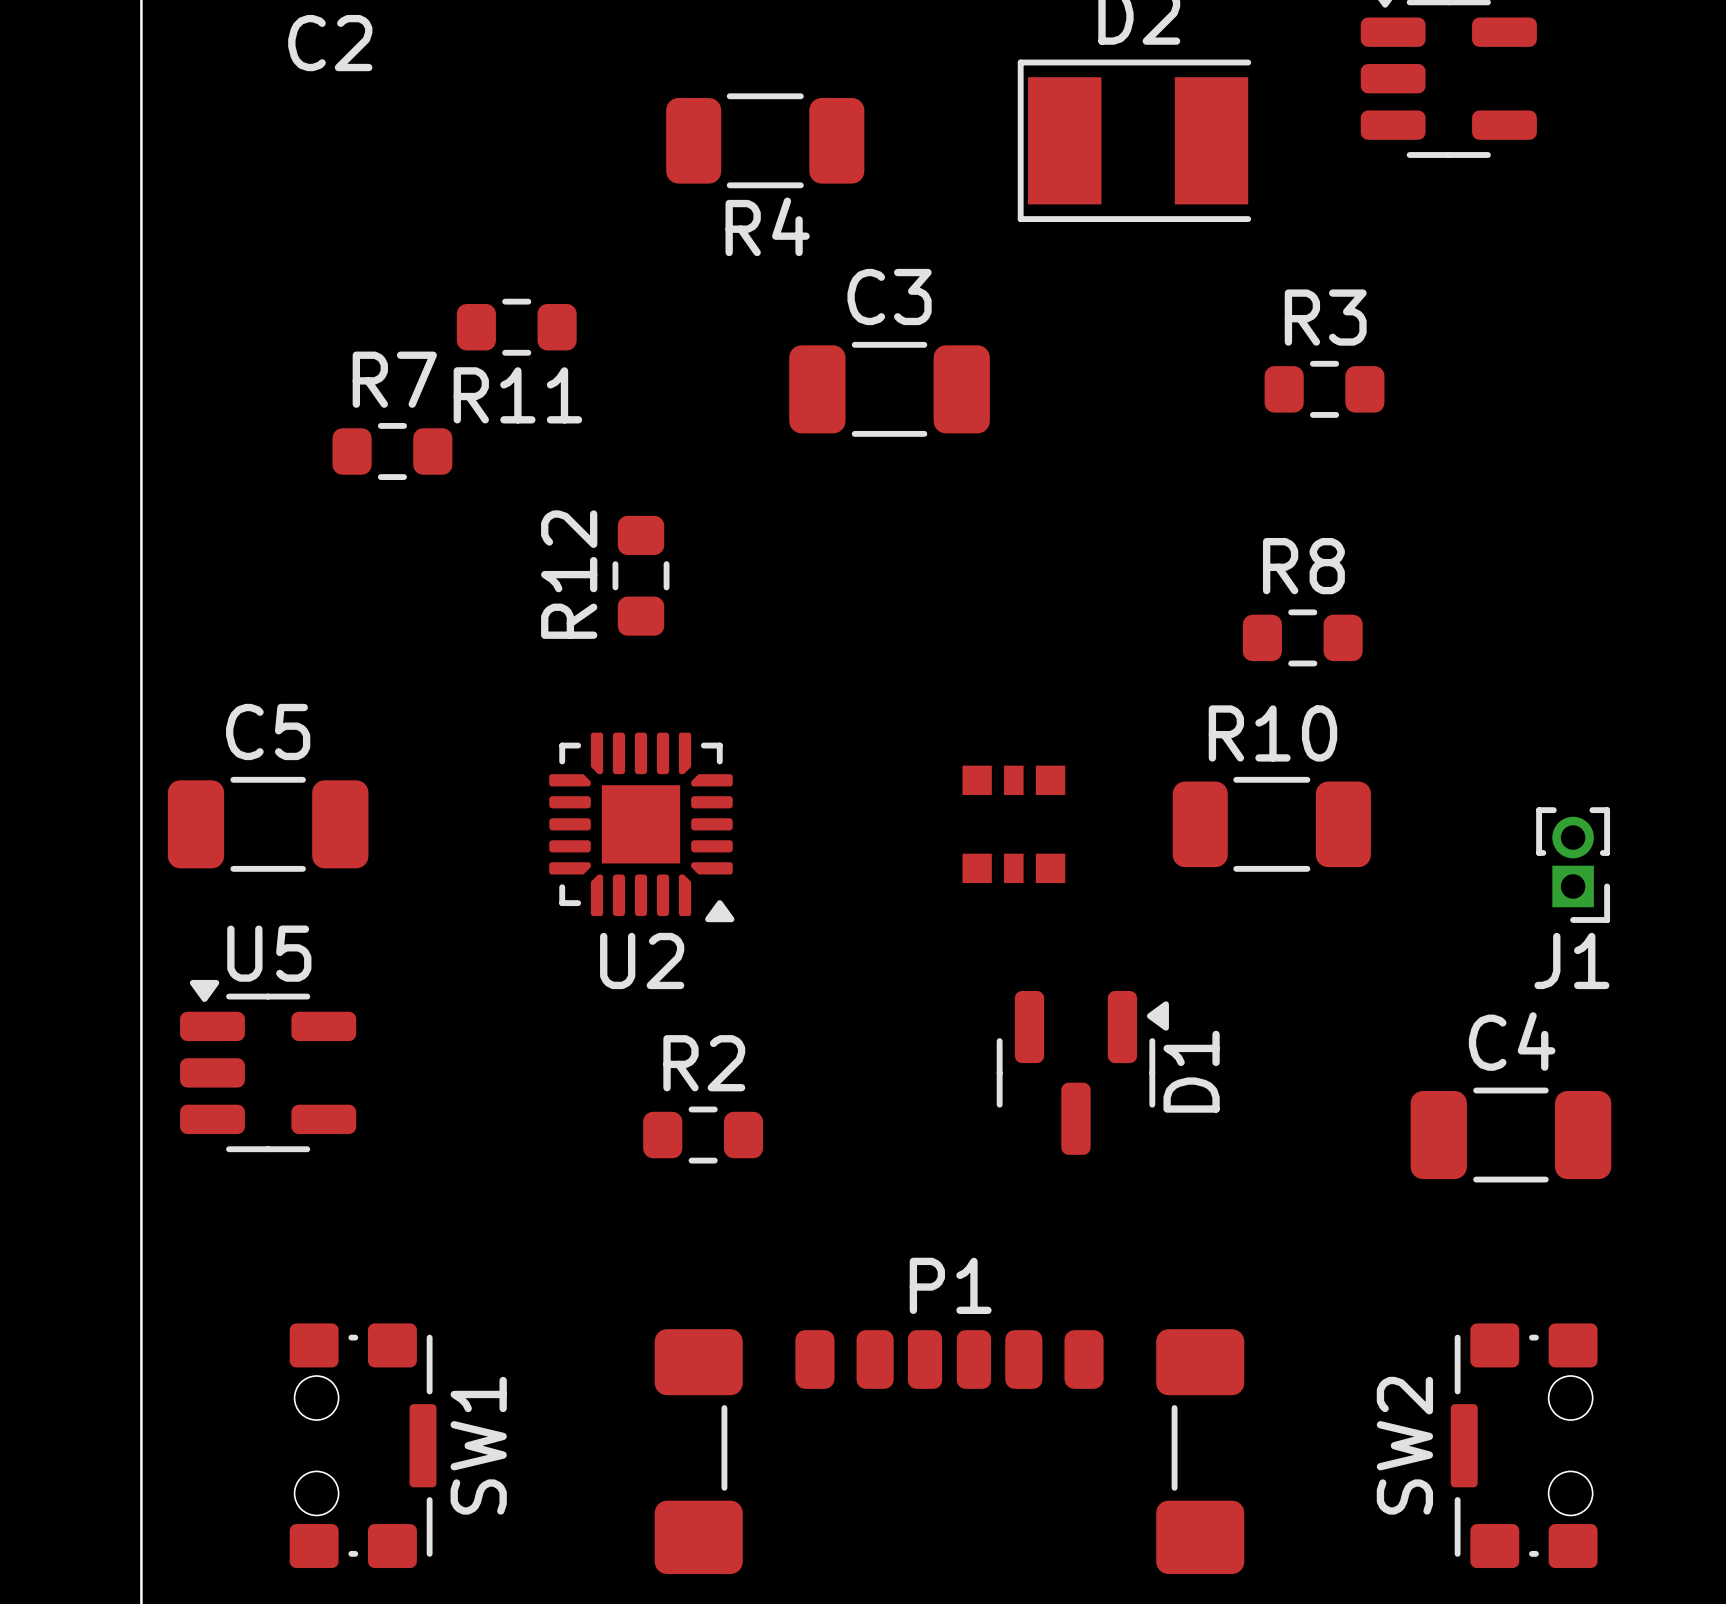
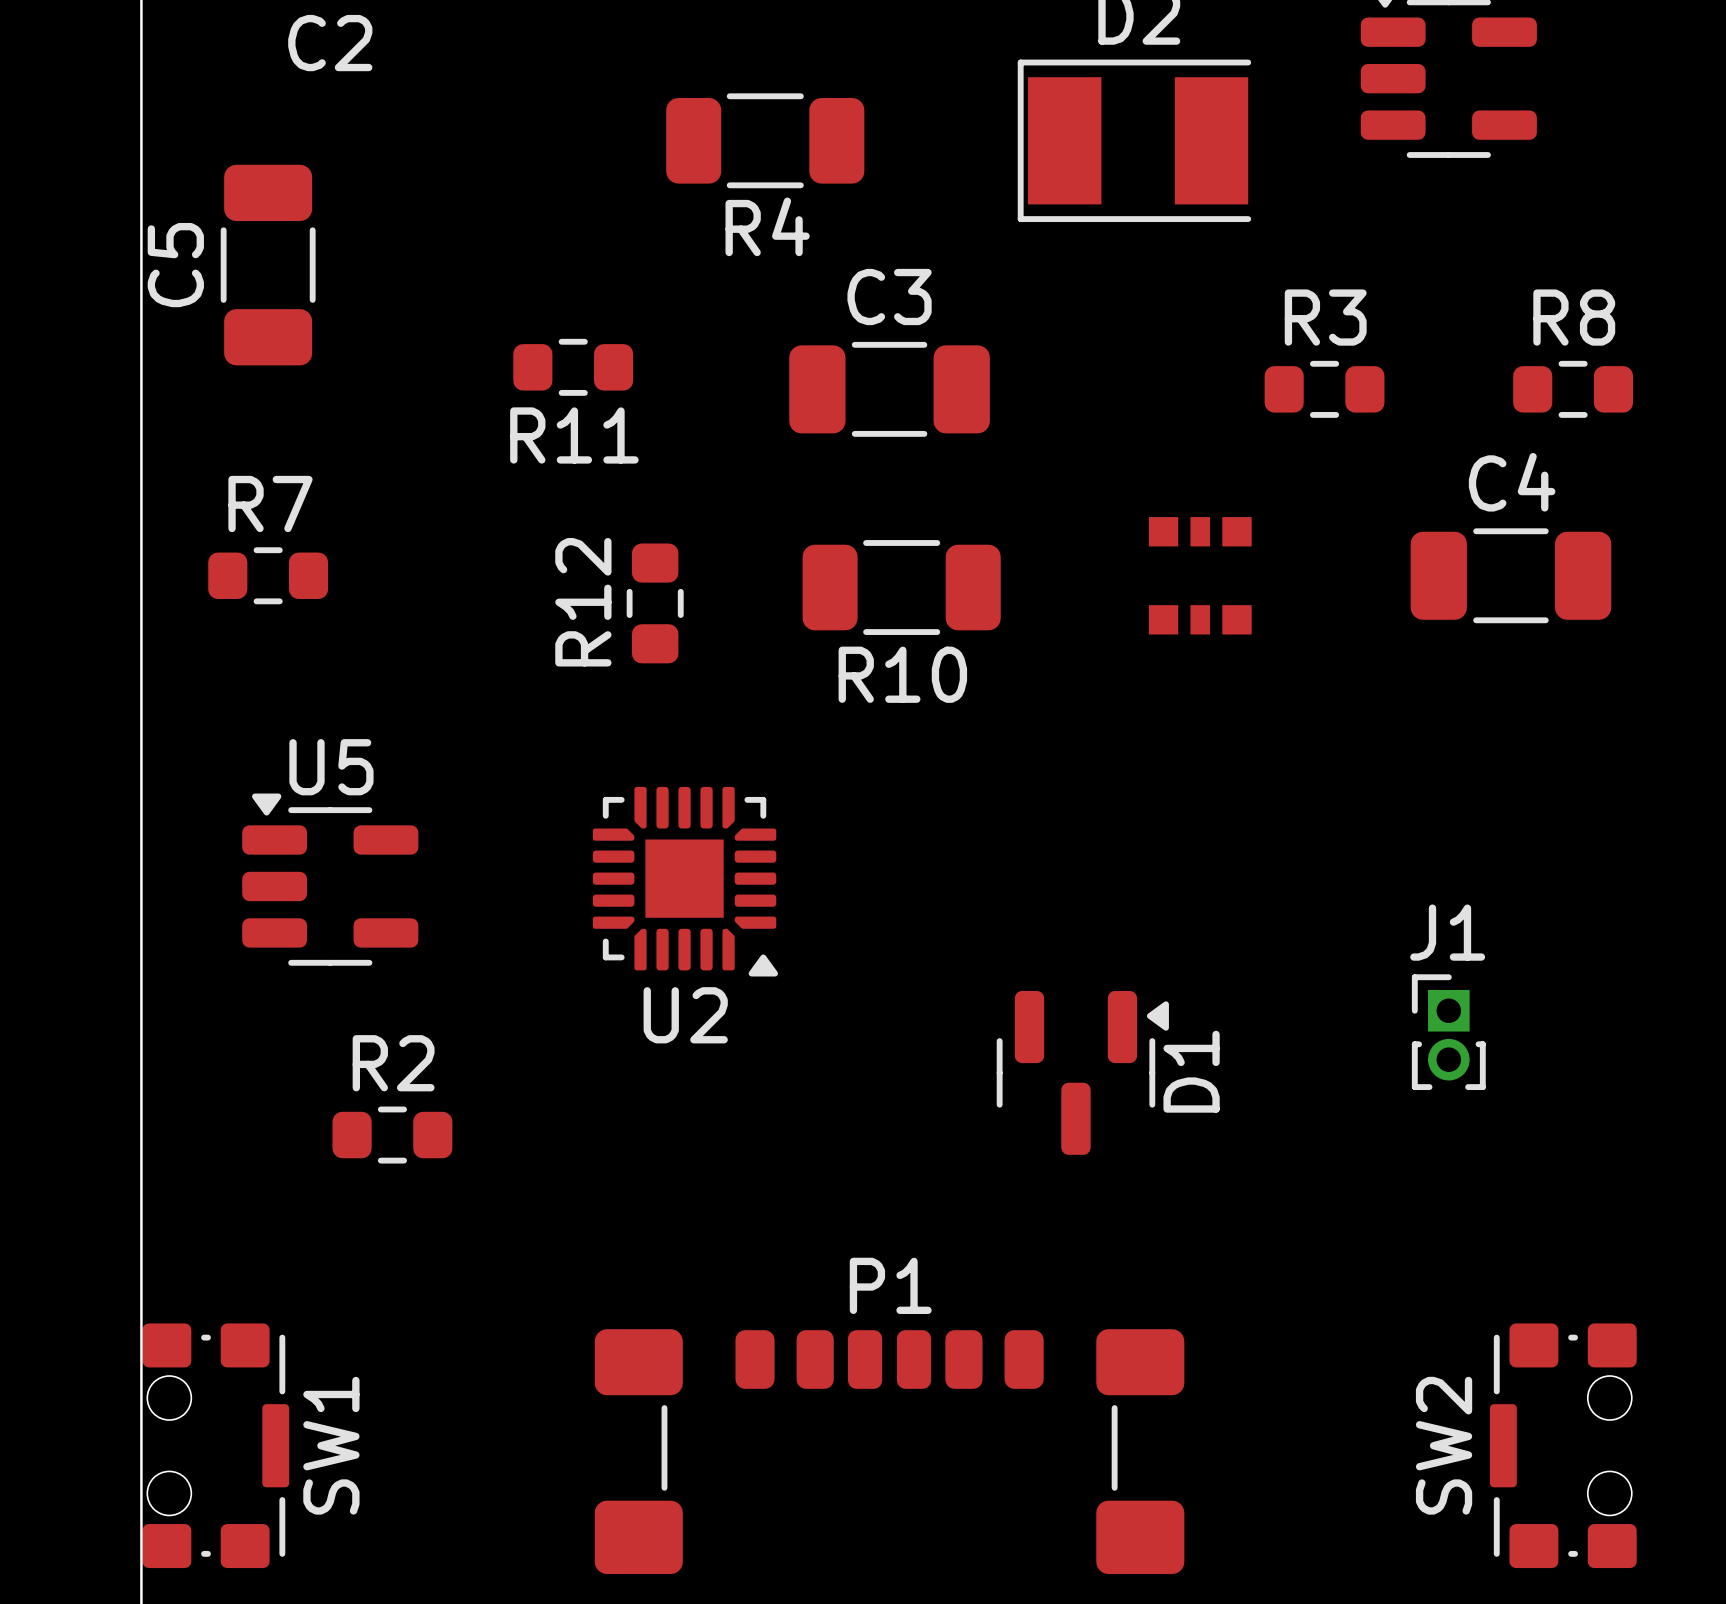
R11 position: (516, 327) -> (573, 367)
R7 position: (392, 451) -> (268, 575)
R12 position: (641, 575) -> (655, 603)
R8 position: (1302, 637) -> (1573, 389)
C5 name position: C5 (268, 731) -> C5 (175, 265)
R10 name position: R10 (1272, 733) -> R10 (902, 674)
C5 rotation: 0° (268, 824) -> 90° clockwise (268, 265)
C5 position: (268, 824) -> (268, 265)
part position: (1013, 824) -> (1200, 575)
R10 position: (1271, 824) -> (901, 587)
U2 position: (641, 827) -> (685, 881)
J1 rotation: 0° (1573, 865) -> 180° (1448, 1032)
J1 position: (1573, 865) -> (1448, 1032)
U5 position: (268, 1066) -> (330, 879)
R2 position: (703, 1135) -> (392, 1135)
C4 position: (1510, 1135) -> (1510, 575)
SW1 position: (363, 1445) -> (215, 1445)
SW2 position: (1524, 1445) -> (1563, 1445)
P1 position: (949, 1451) -> (889, 1451)

